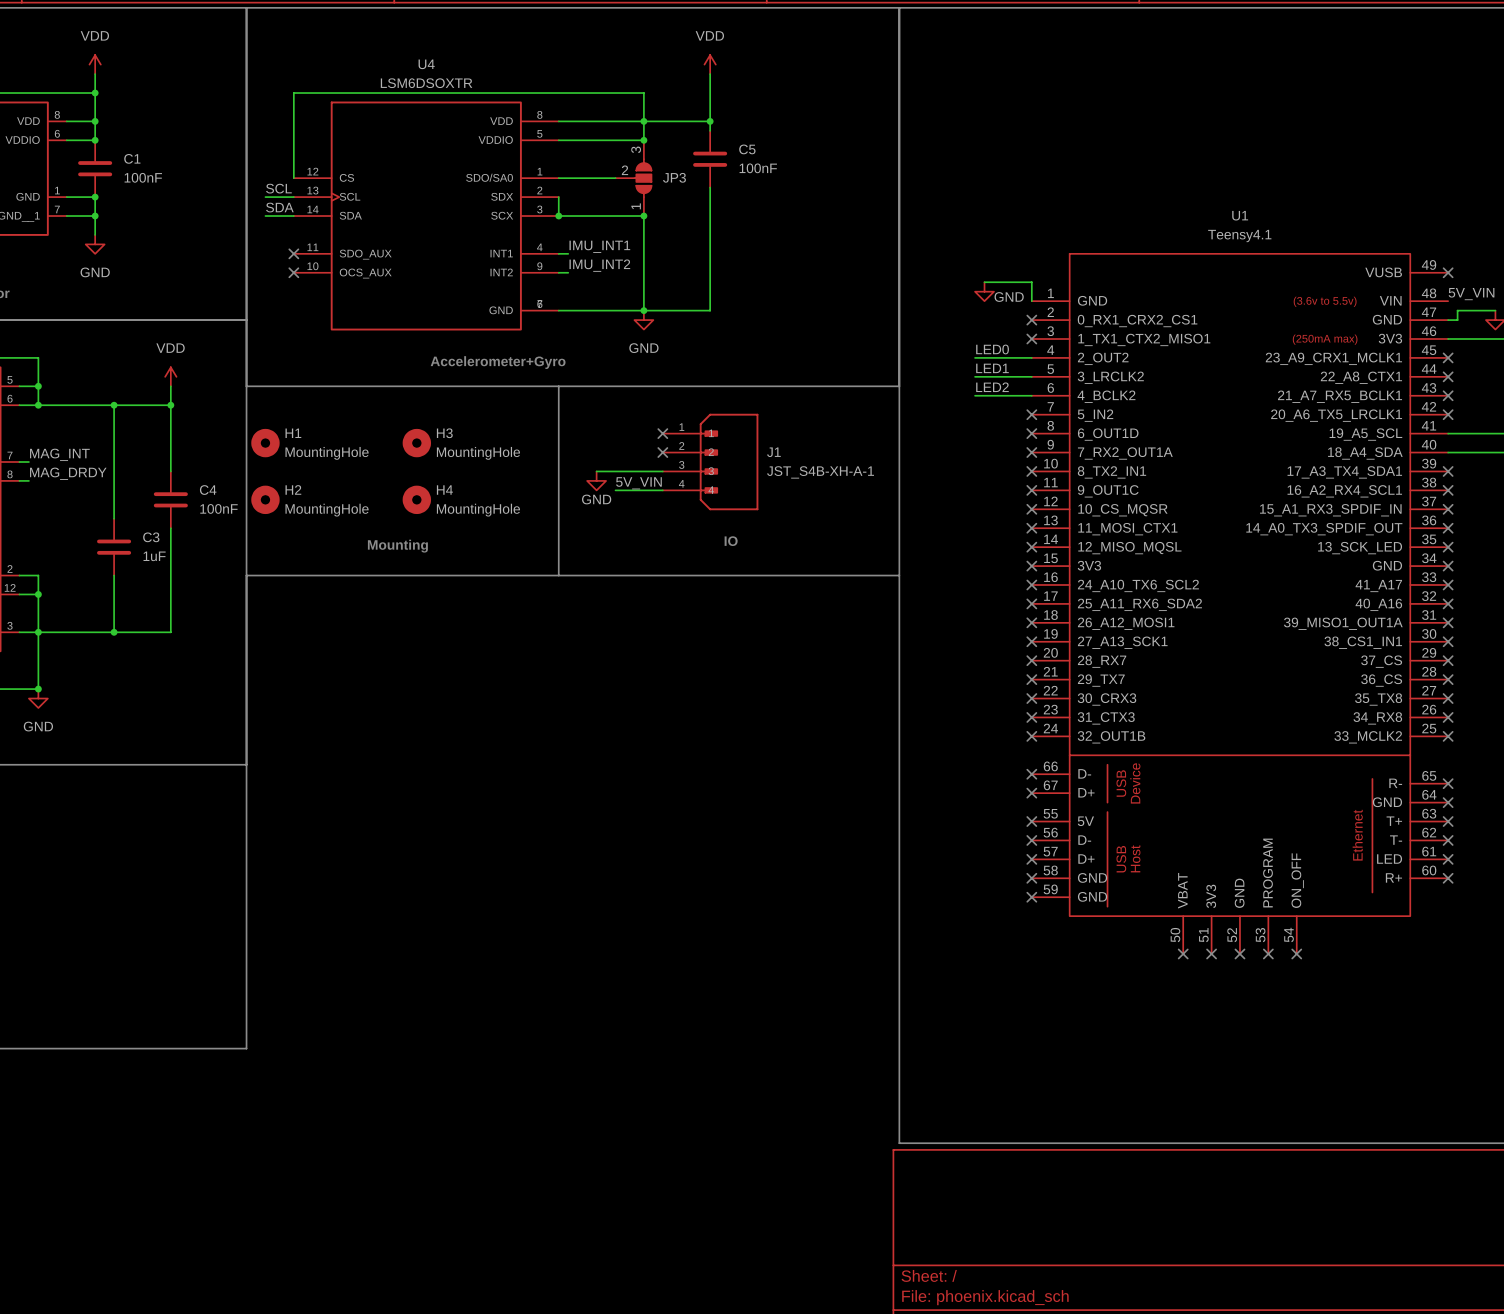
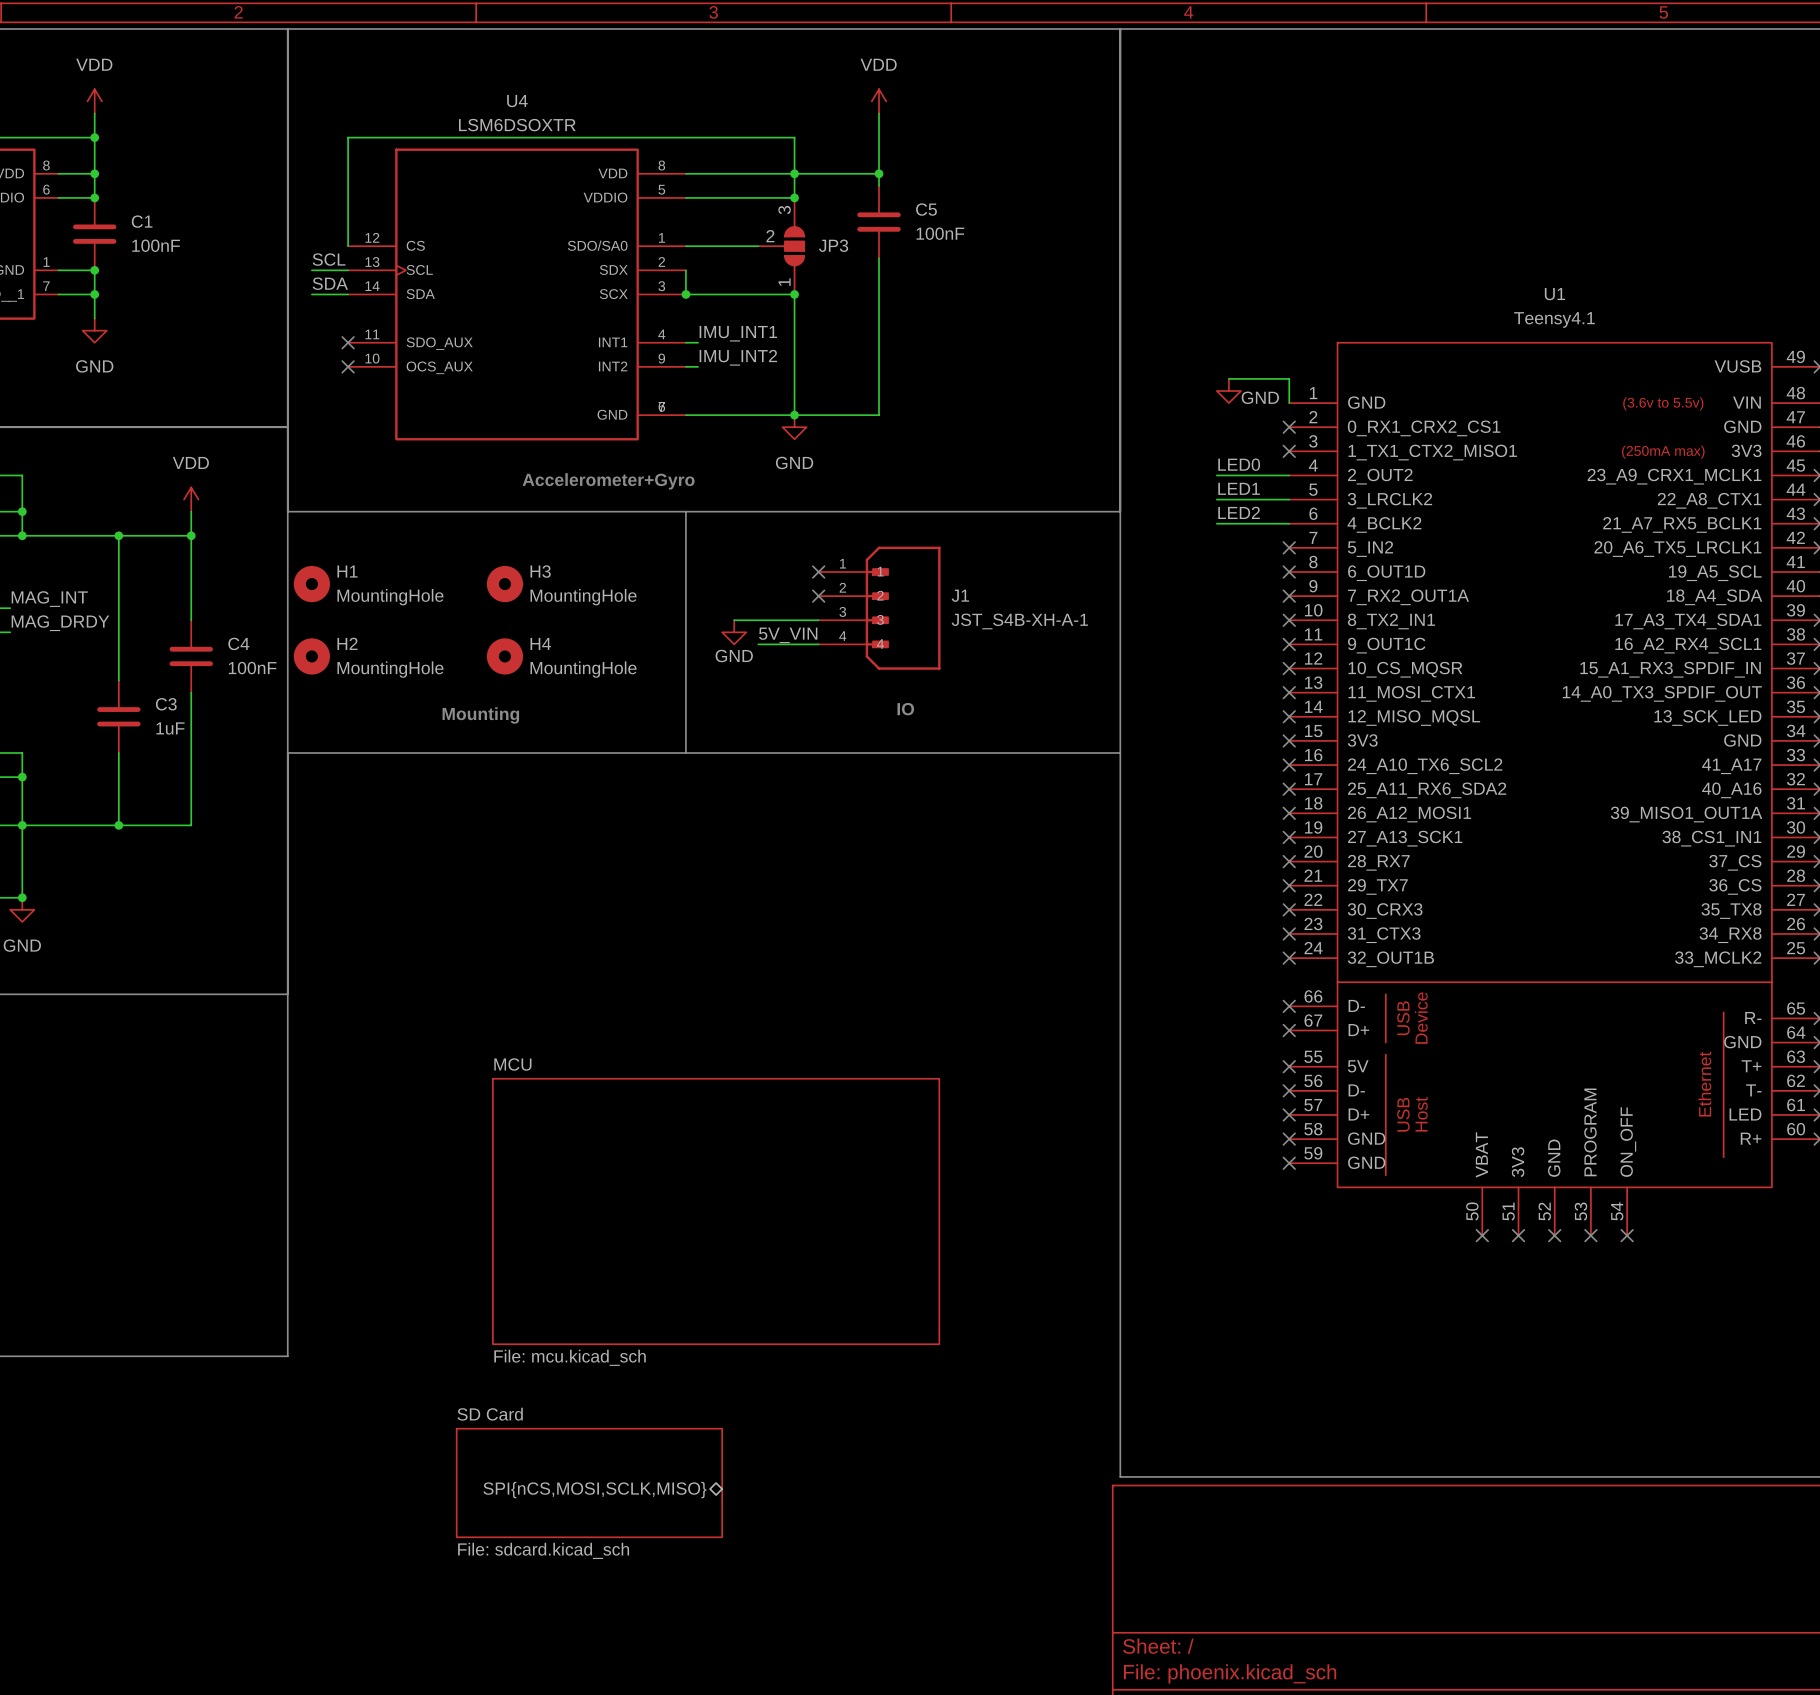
sheet MCU: none -> File: mcu.kicad_sch (716, 1211)
sheet SD Card: none -> File: sdcard.kicad_sch (589, 1482)
sheet pin: none -> SPI{nCS,MOSI,SCLK,MISO} (594, 1490)

